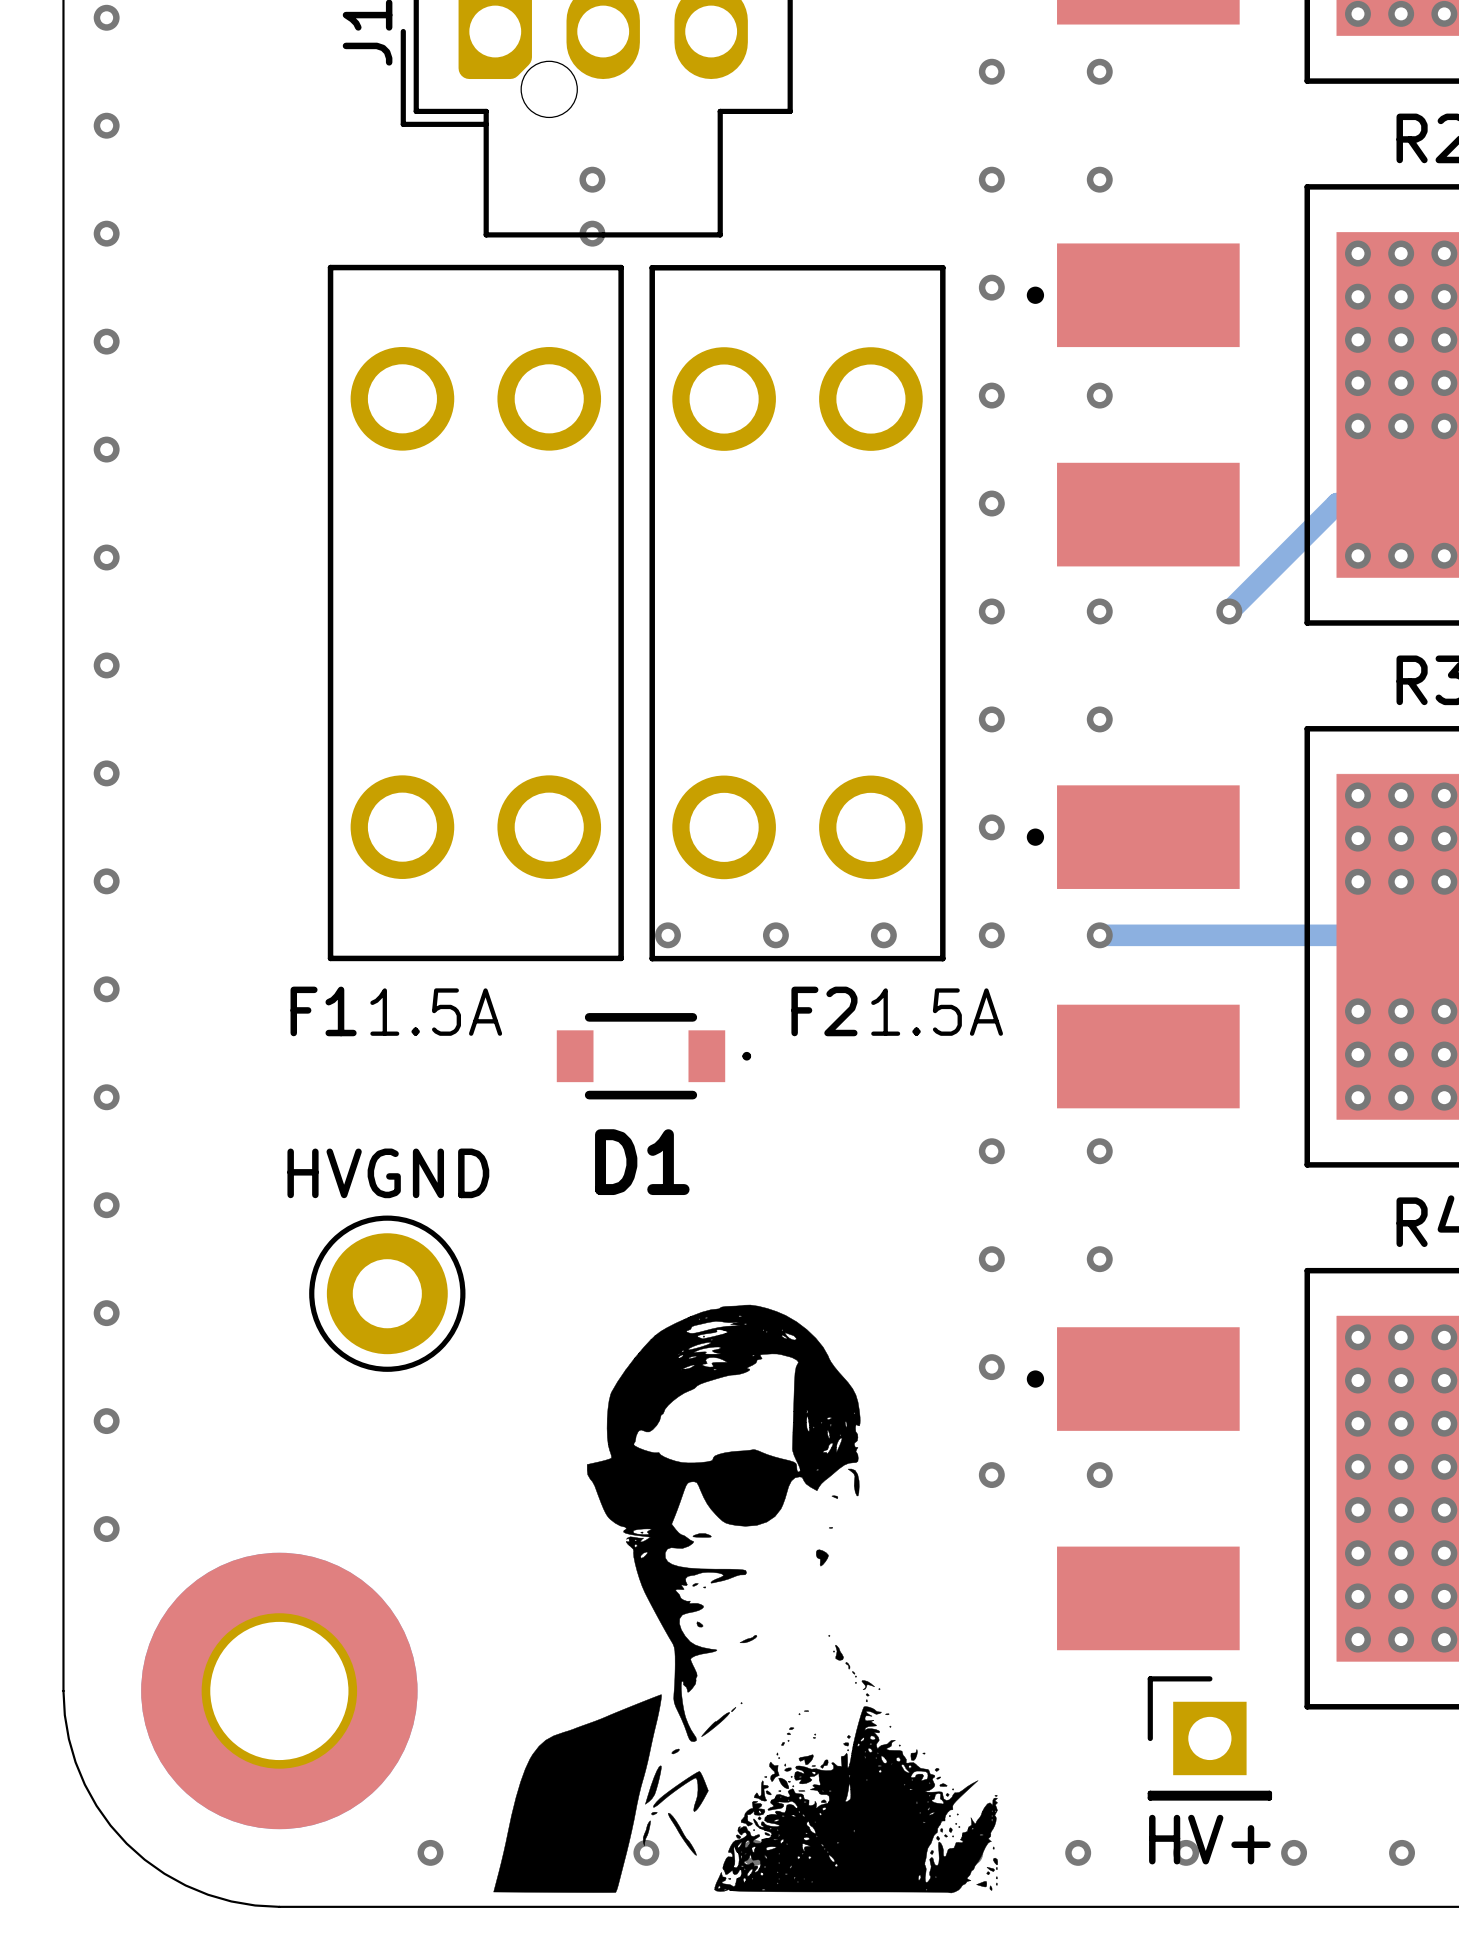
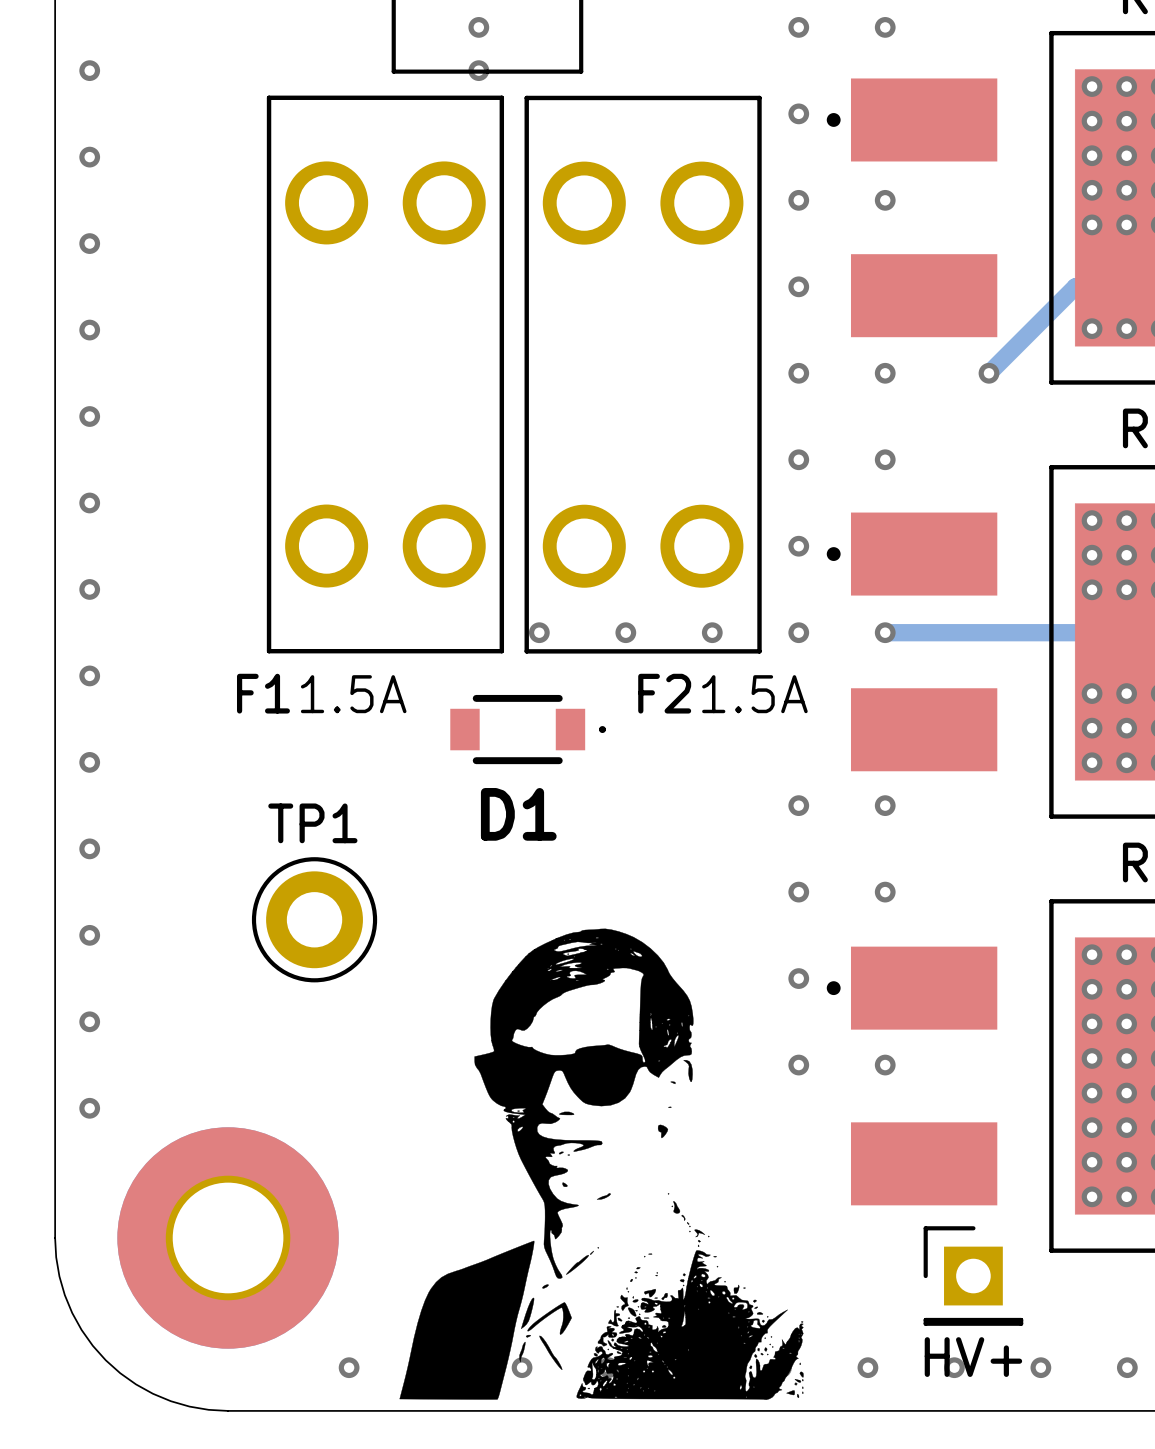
HVGND name: HVGND (388, 1173) -> TP1 (312, 823)

